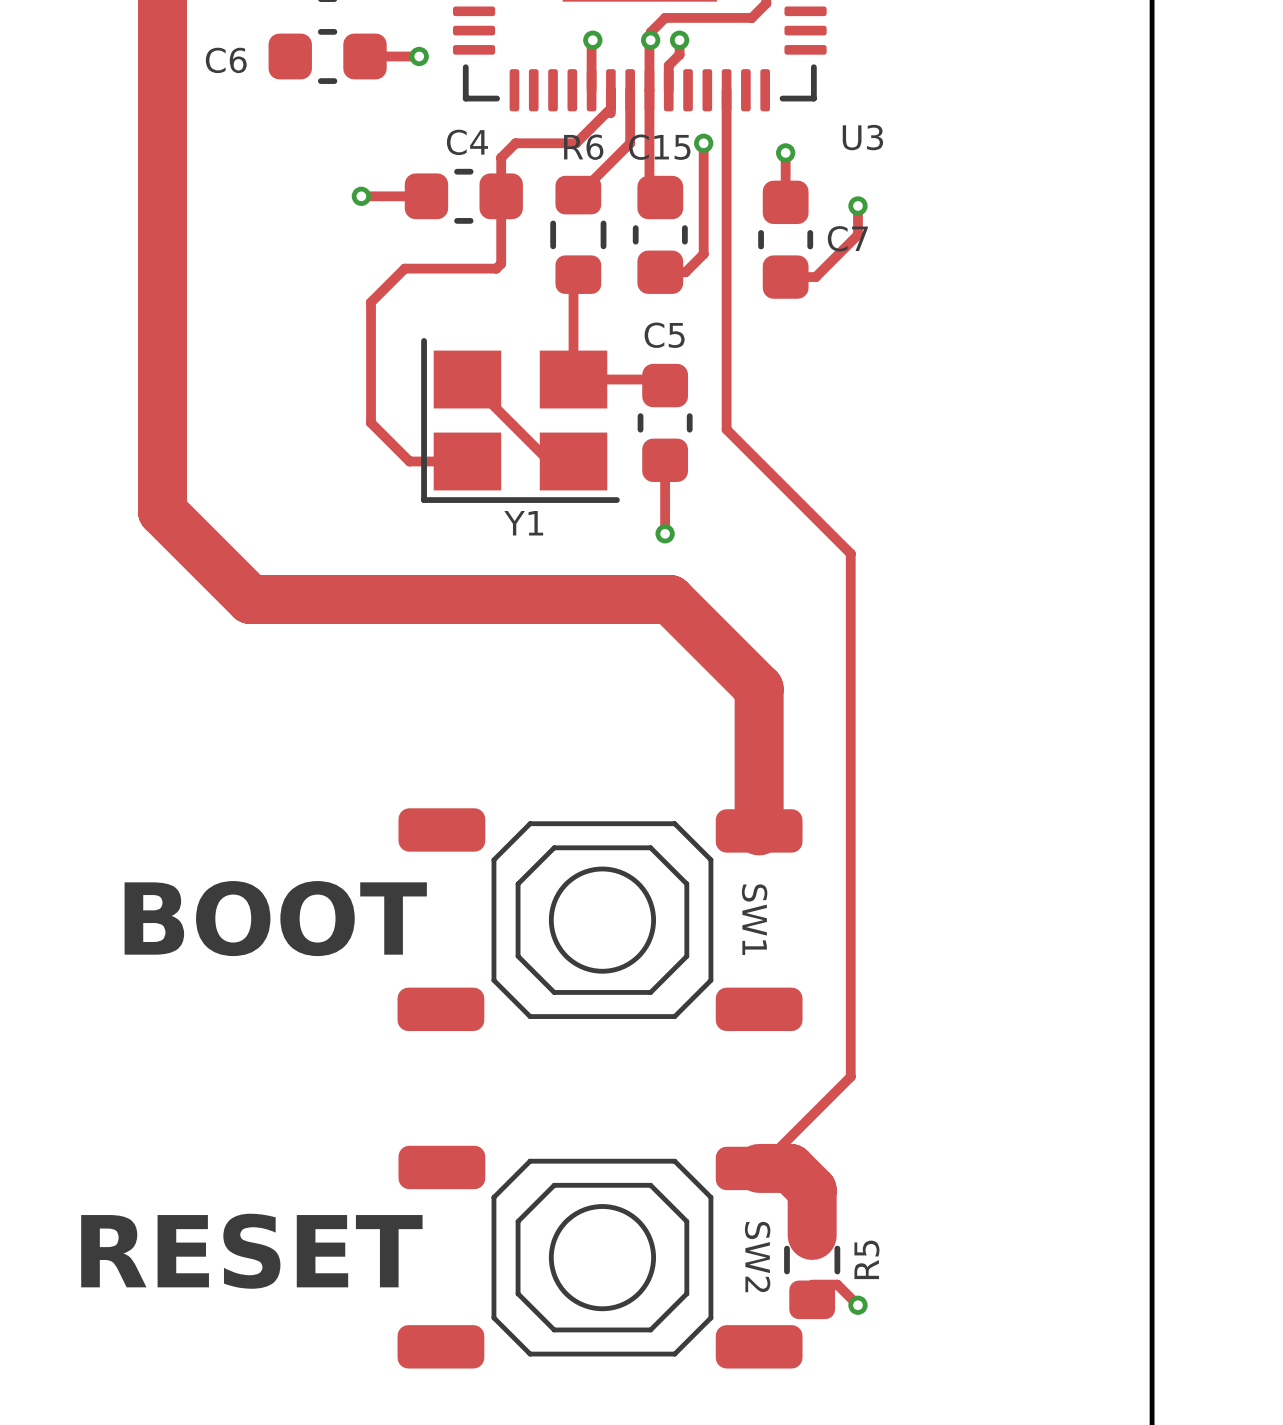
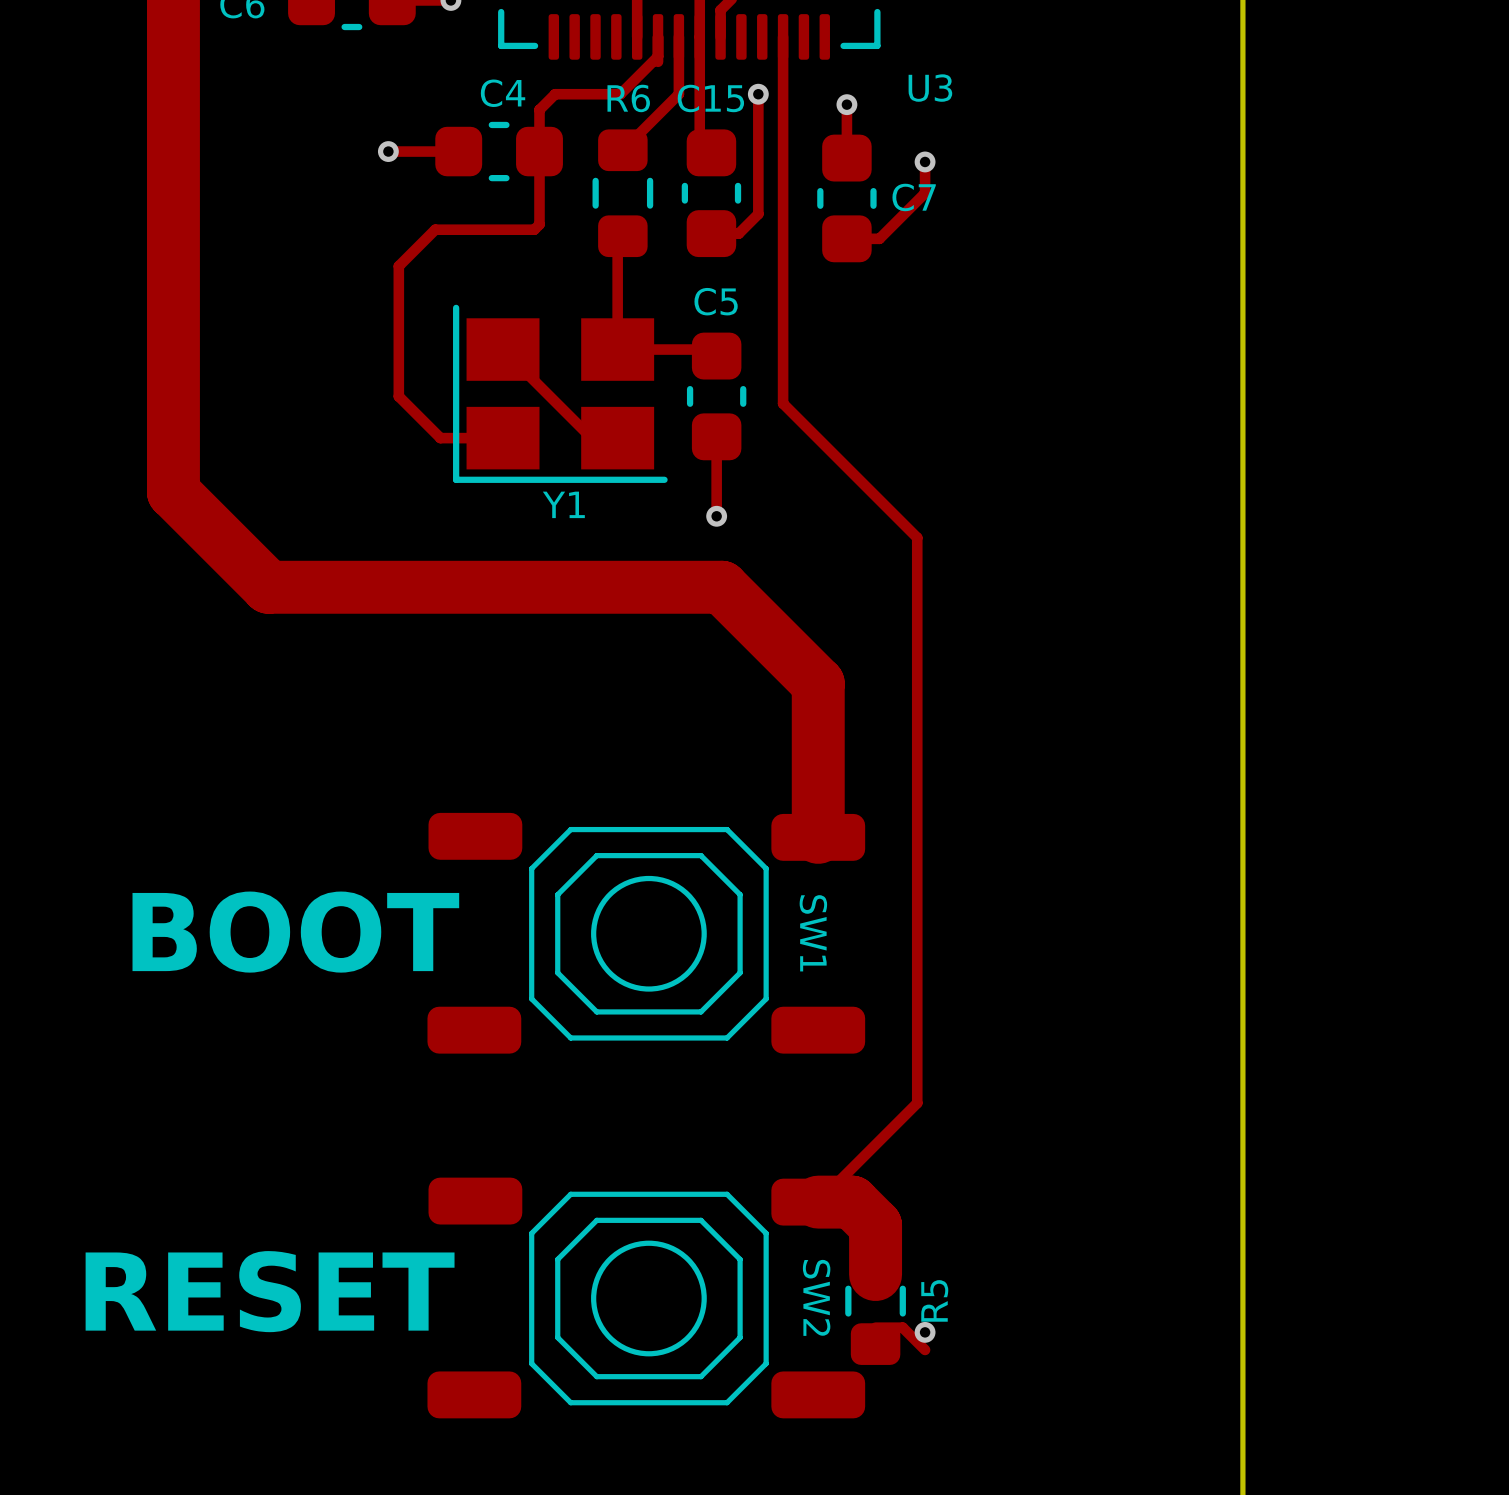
via position: (857, 1305) -> (925, 1332)

